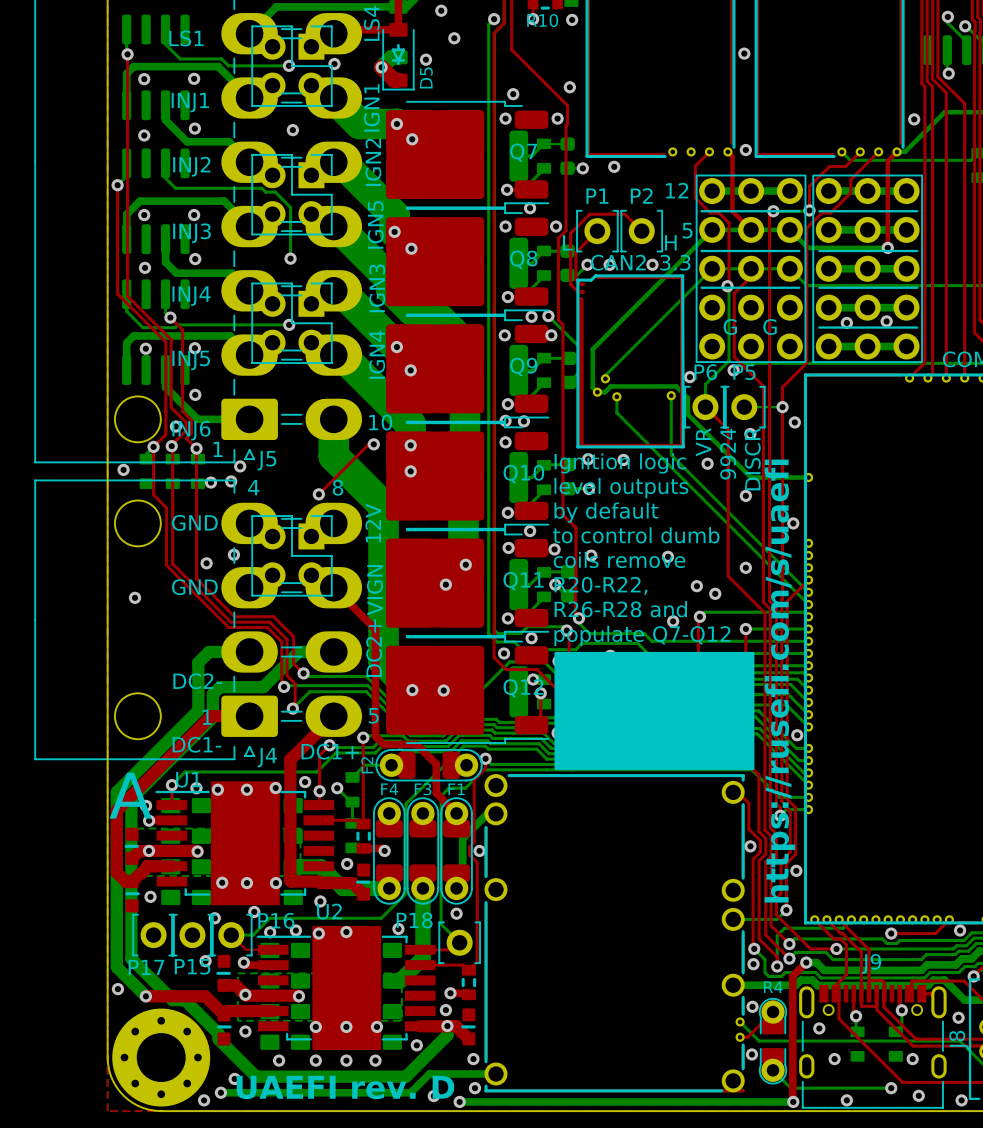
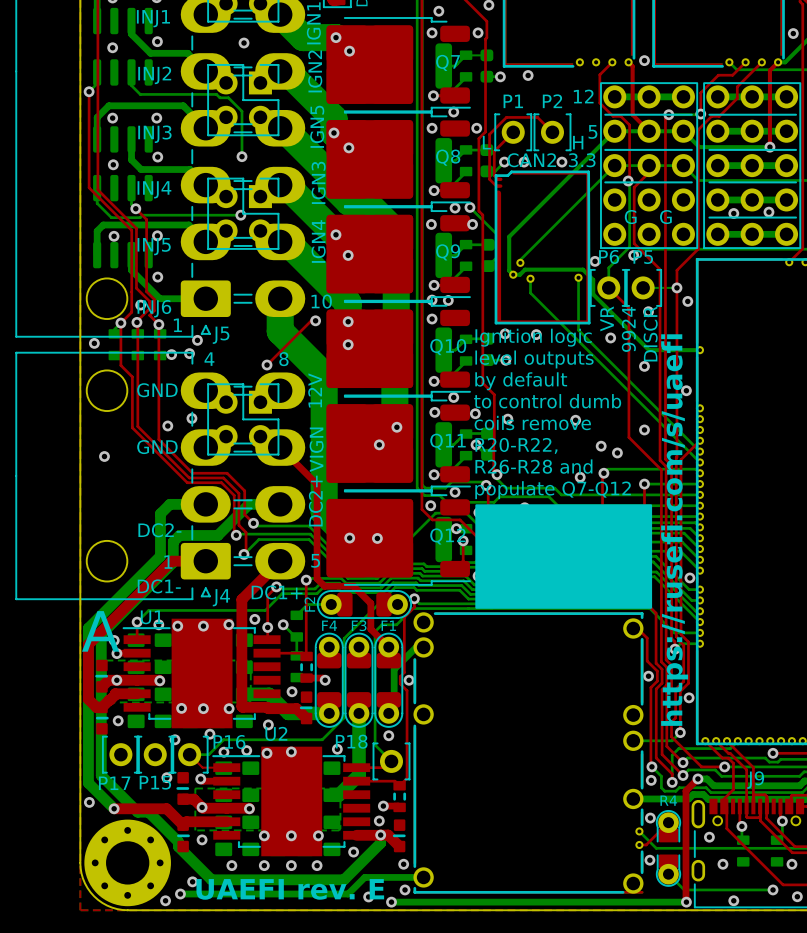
text: UAEFI rev. D (345, 1087) -> UAEFI rev. E (290, 889)

